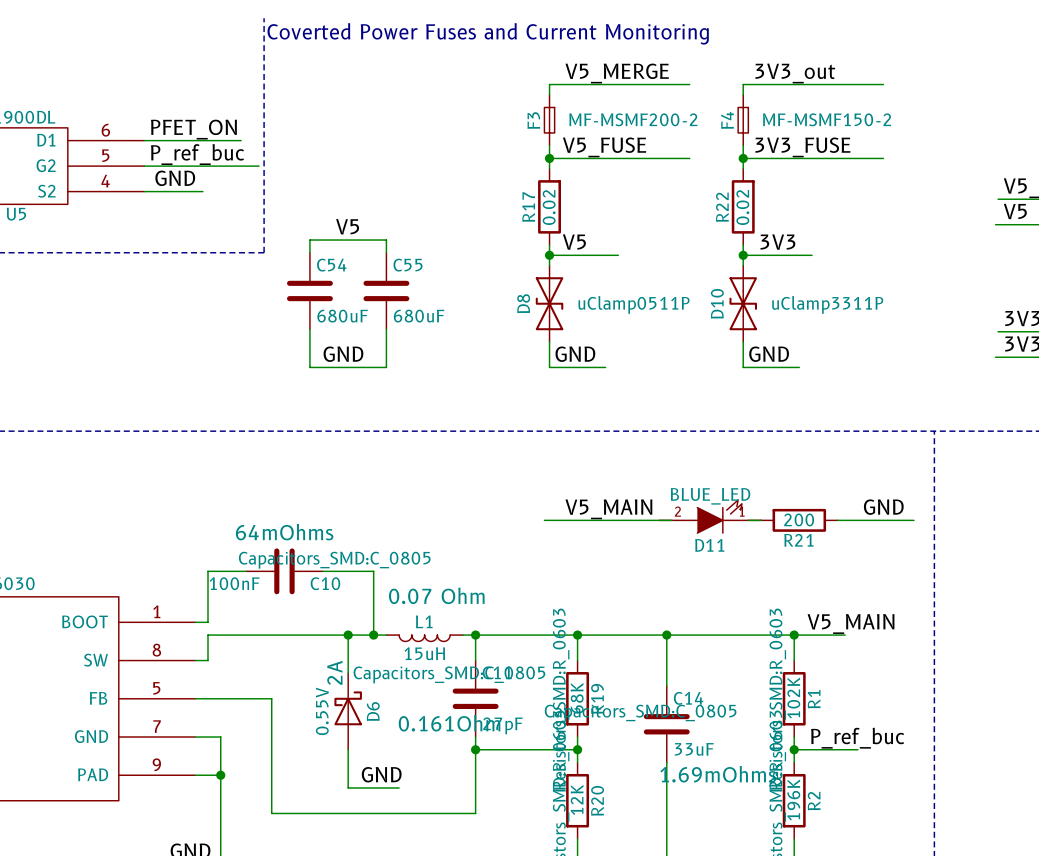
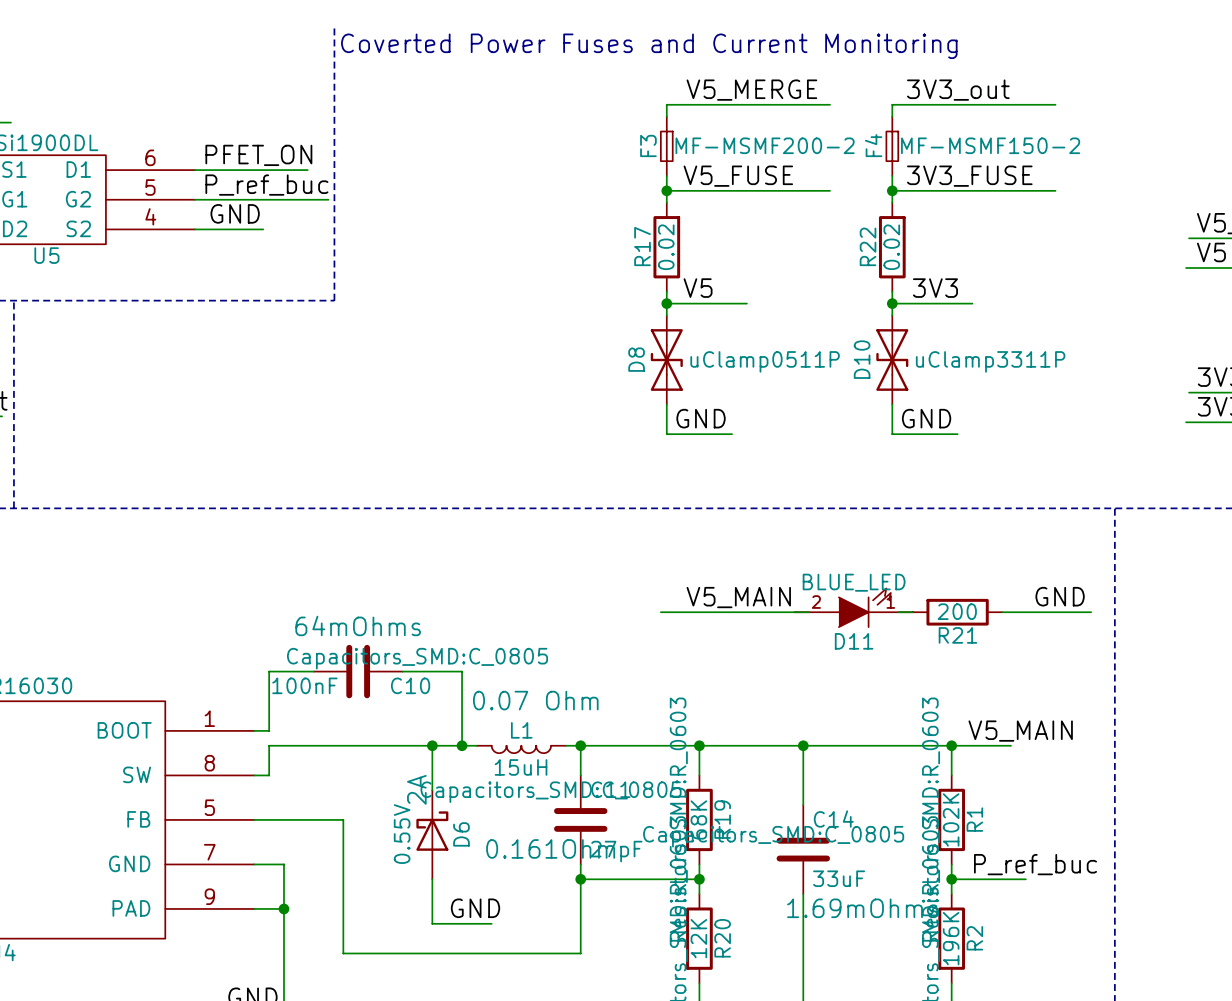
label: V5 (347, 226) -> none
wire: (309, 252) (309, 240) (386, 240) (386, 252) -> none
C54: 680uF (309, 290) -> none
C55: 680uF (386, 290) -> none
wire: (309, 329) (309, 367) (386, 367) (386, 329) -> none
label: GND (343, 354) -> none

